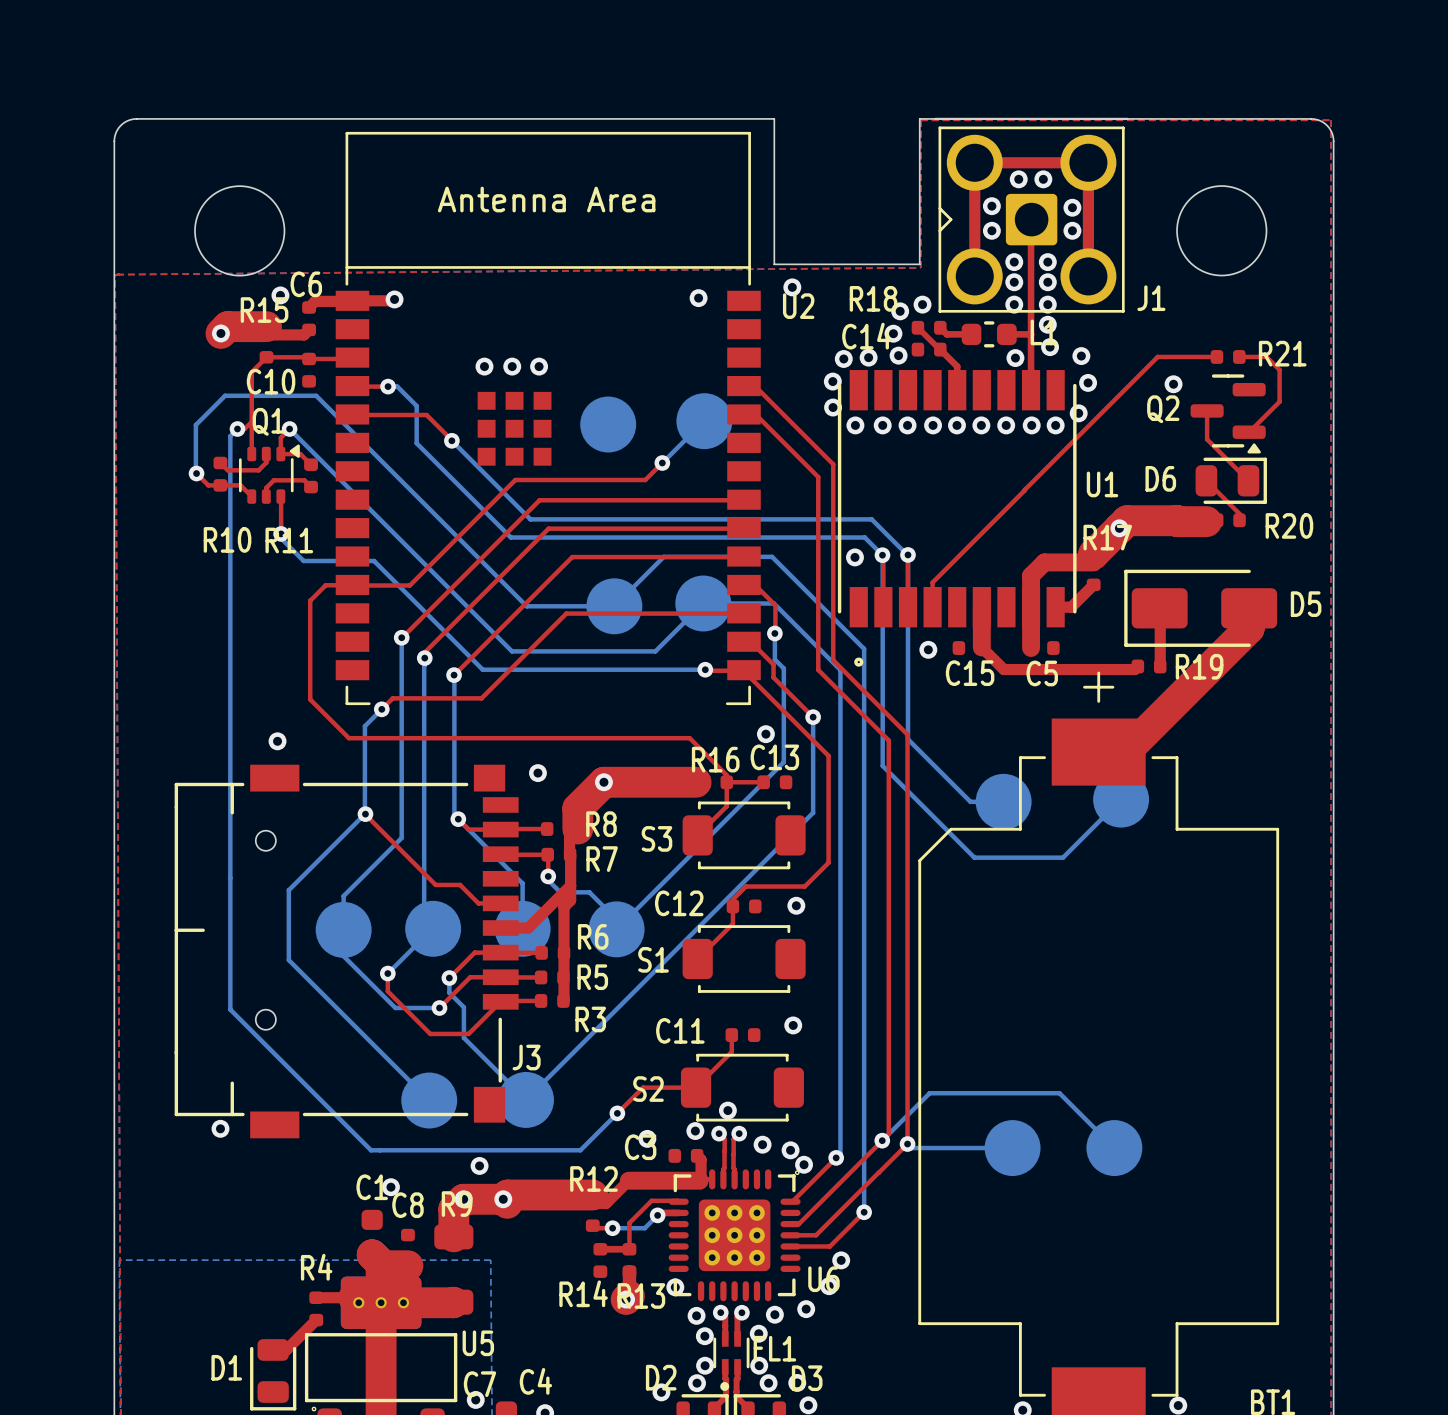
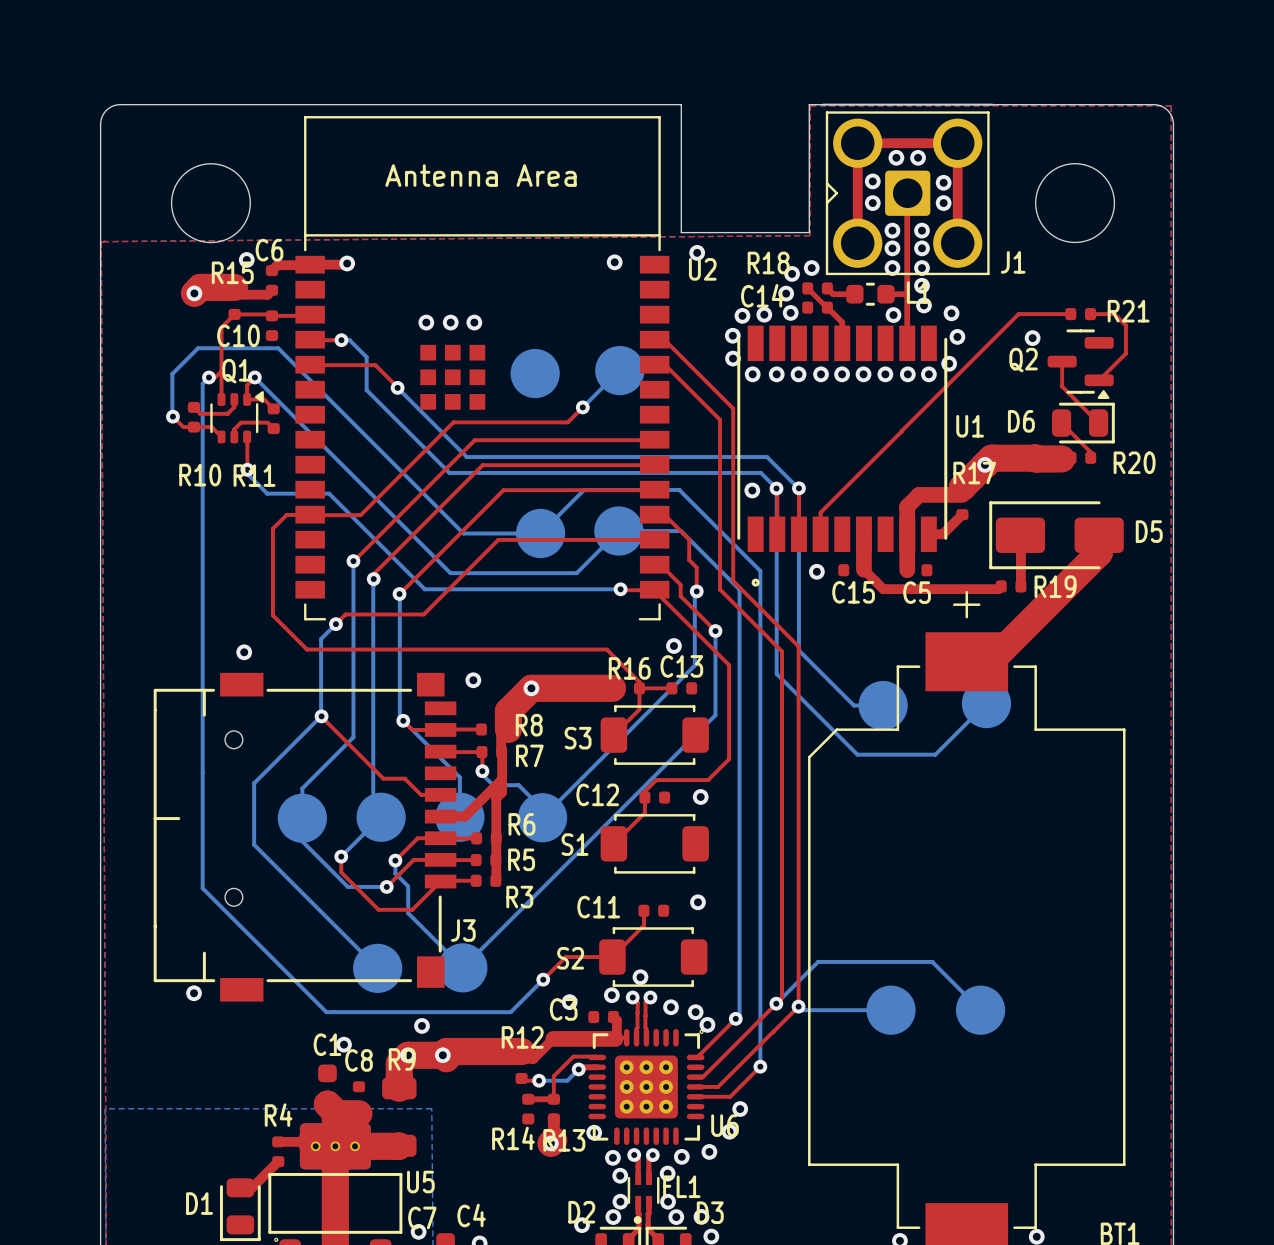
top track: (775, 605) (774, 633) -> (682, 532) (689, 539) (689, 560) (696, 567) (696, 591)
bottom track: (774, 633) (774, 659) (783, 668) (783, 762) -> (696, 591) (694, 593) (694, 665) (689, 670)
via position: (774, 633) -> (696, 591)

